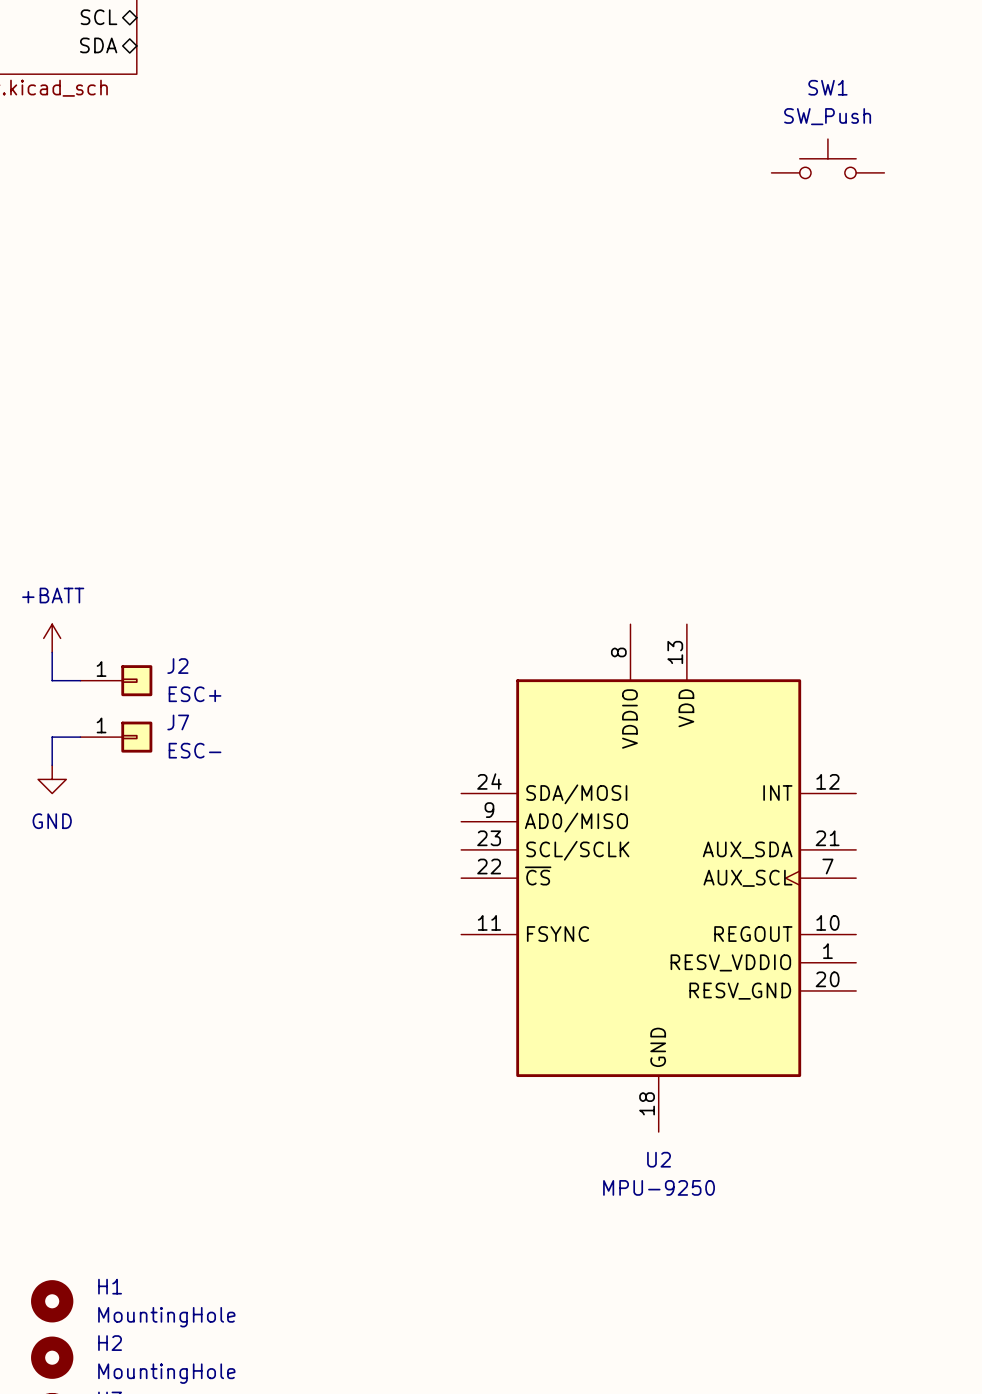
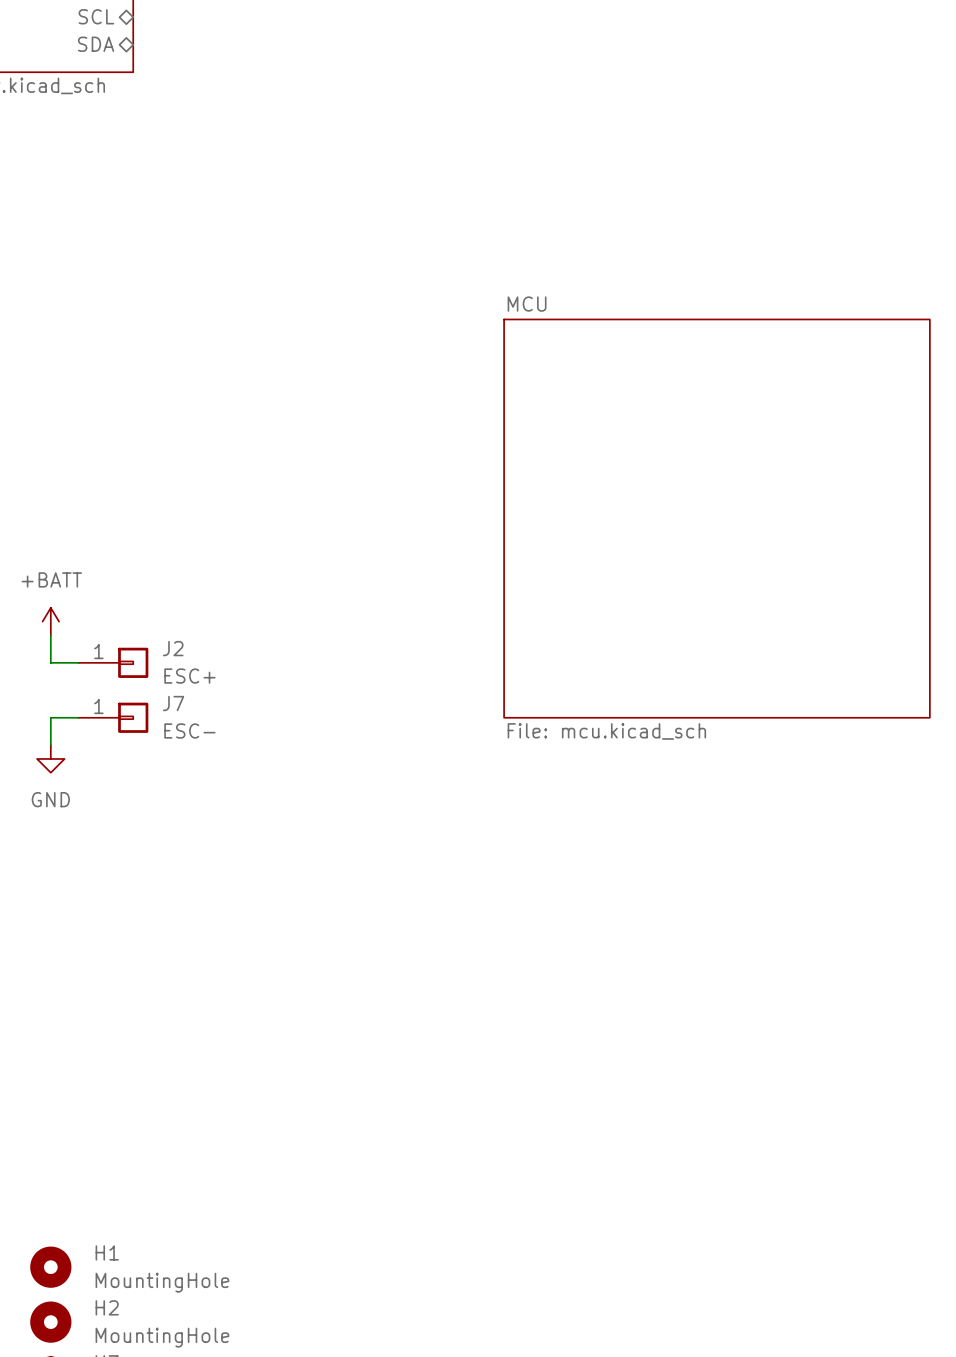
SW1: SW_Push (827, 158) -> none
sheet MCU: none -> File: mcu.kicad_sch (716, 518)
U2: MPU-9250 (658, 878) -> none

